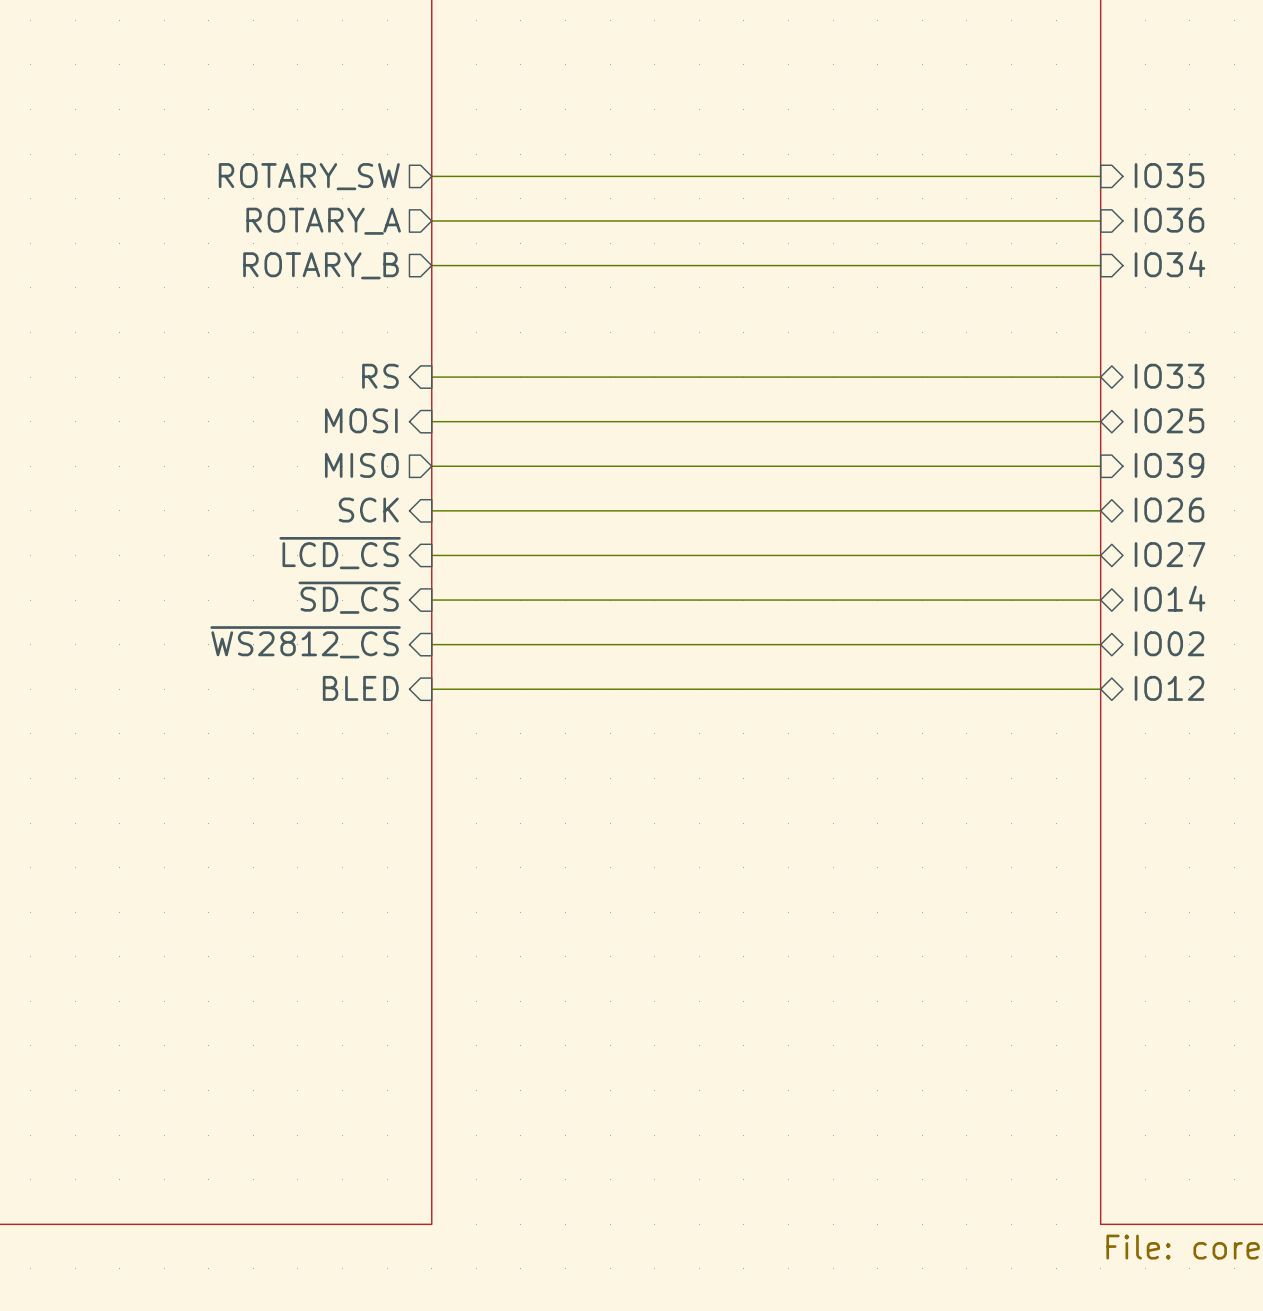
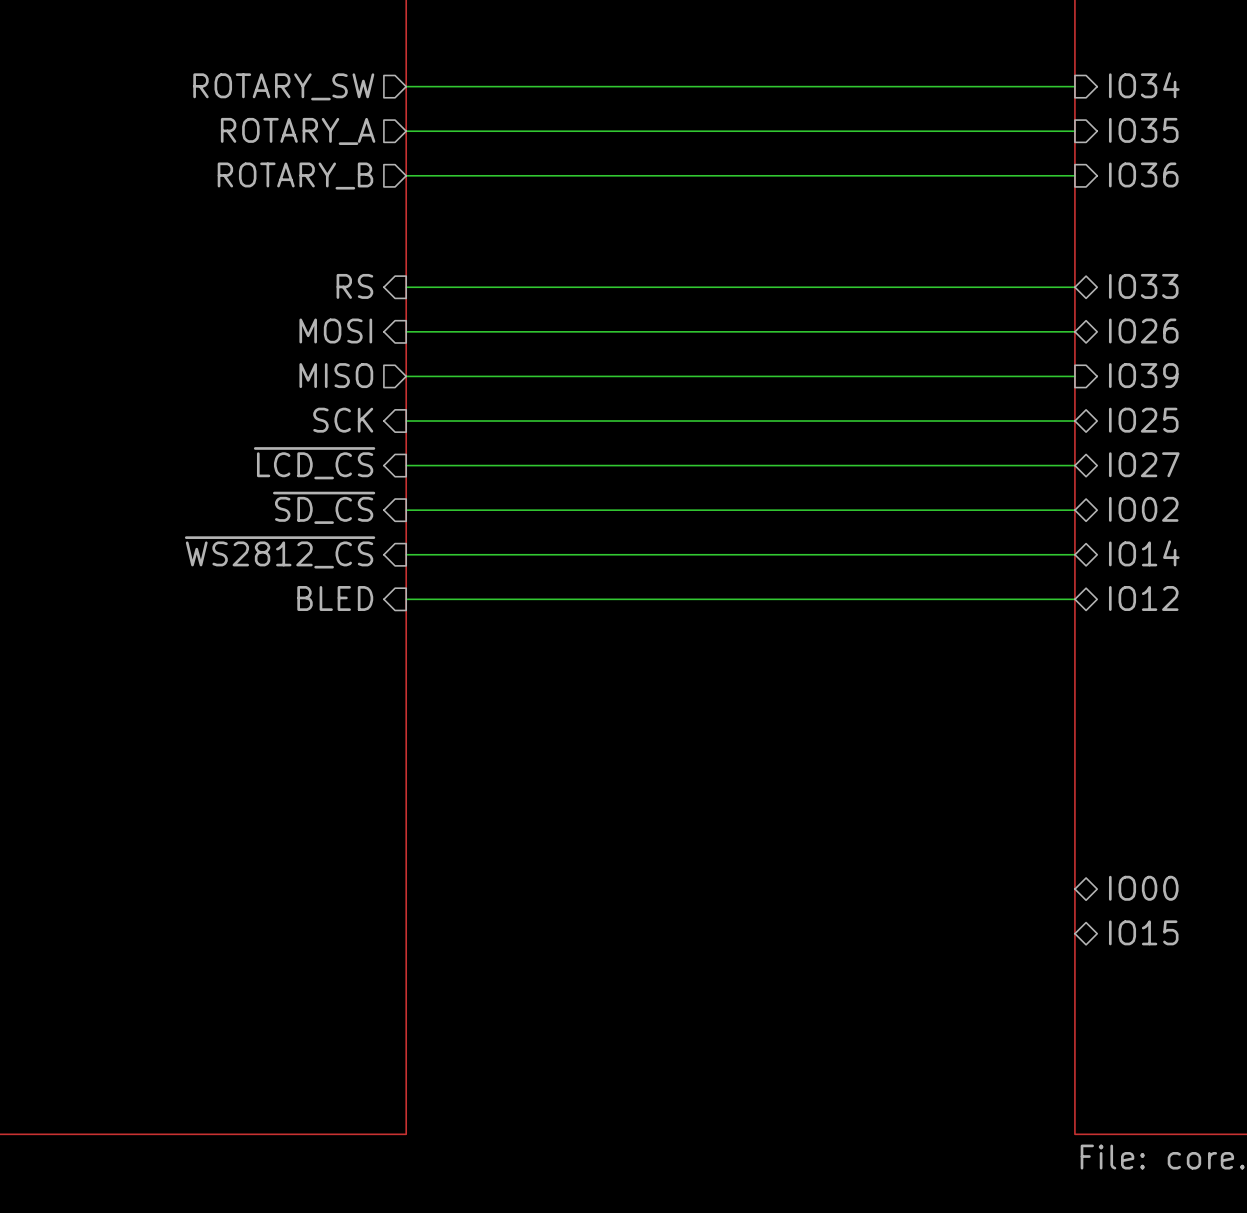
sheet pin: IO35 (1169, 175) -> IO34 (1144, 85)
sheet pin: IO36 (1169, 220) -> IO35 (1143, 130)
sheet pin: IO34 (1170, 264) -> IO36 (1143, 174)
sheet pin: IO25 (1169, 420) -> IO26 (1143, 331)
sheet pin: IO26 (1169, 510) -> IO25 (1143, 420)
sheet pin: IO14 (1170, 598) -> IO02 (1143, 509)
sheet pin: IO02 (1169, 643) -> IO14 (1144, 553)
sheet pin: none -> IO00 (1143, 888)
sheet pin: none -> IO15 (1143, 932)

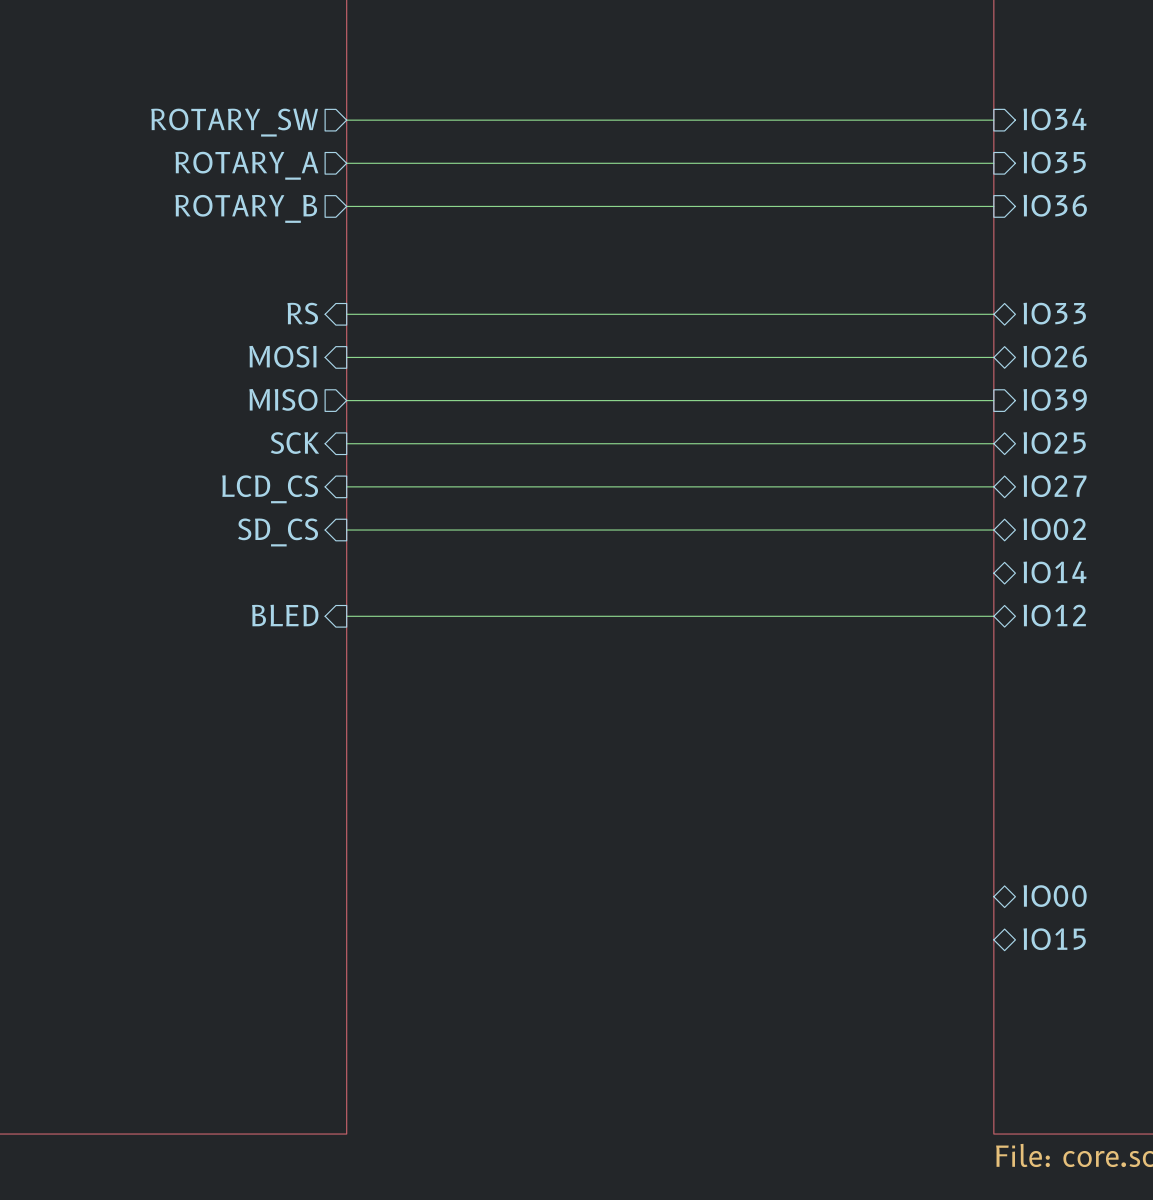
sheet pin: ~{LCD_CS} (314, 463) -> LCD_CS (270, 489)
sheet pin: ~{SD_CS} (324, 507) -> SD_CS (278, 532)
sheet pin: ~{WS2812_CS} (280, 552) -> none
wire: (406, 554) (1074, 554) -> none

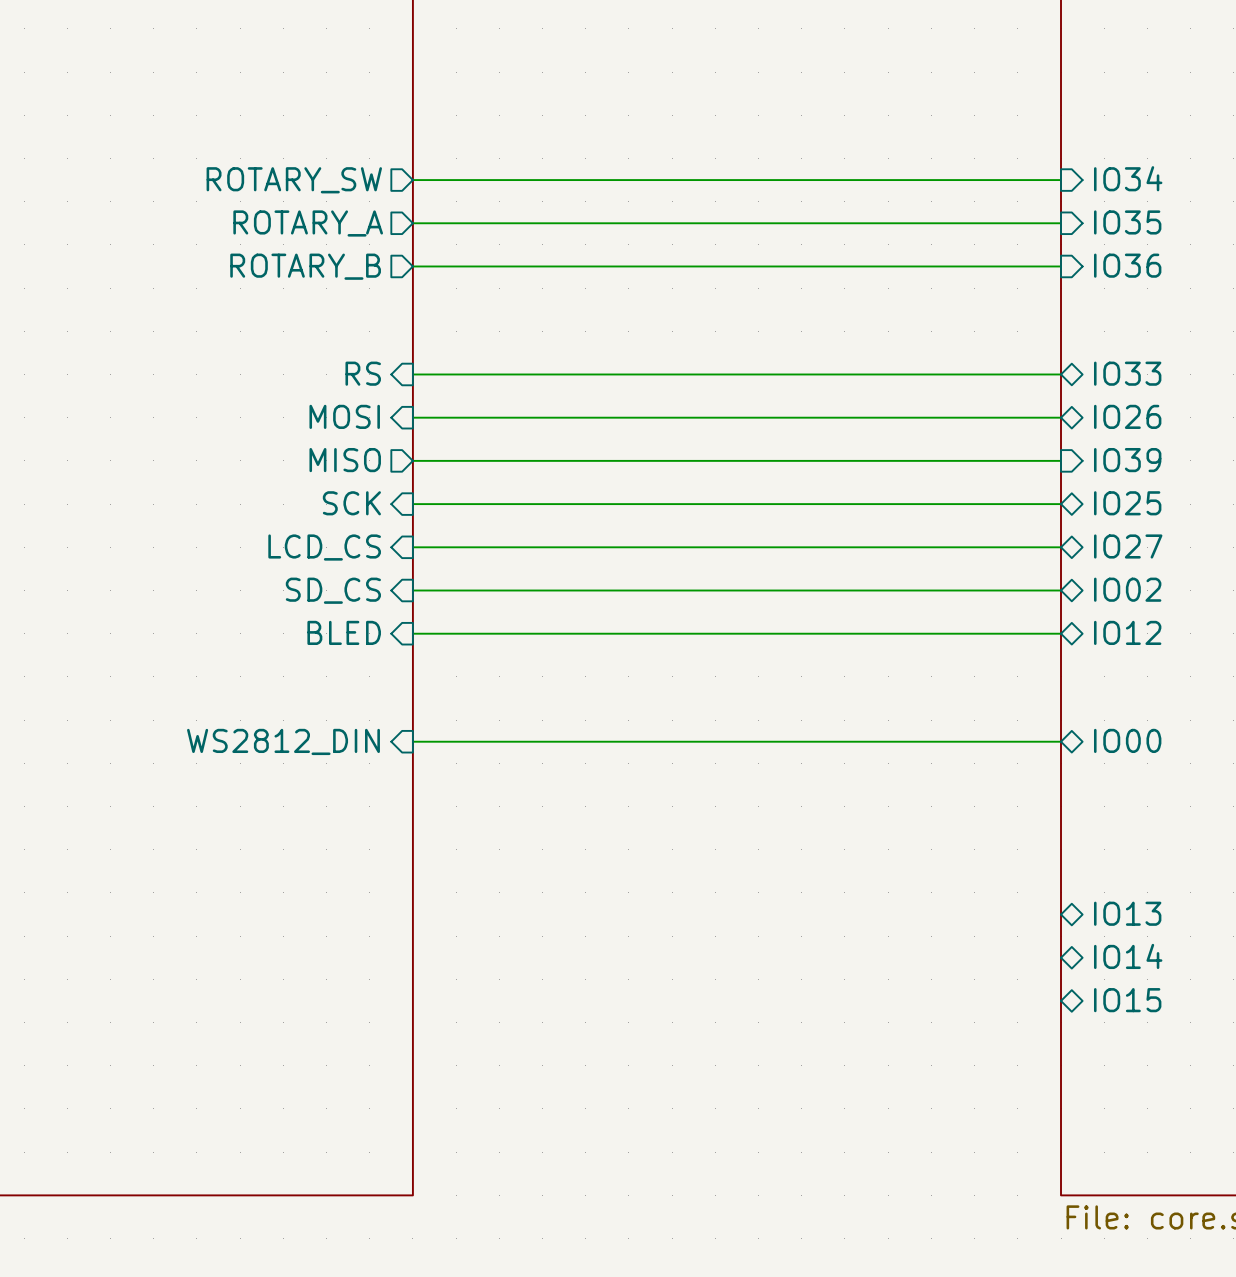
sheet pin: IO14 (1055, 572) -> IO12 (1127, 632)
sheet pin position: BLED (285, 615) -> BLED (344, 632)
sheet pin: IO12 (1054, 615) -> none
wire: (346, 616) (993, 616) -> (412, 633) (1061, 633)
sheet pin: none -> IO00 (1127, 740)
wire: none -> (412, 741) (1061, 741)
sheet pin: none -> WS2812_DIN (283, 741)
sheet pin: none -> IO13 (1127, 913)
sheet pin: IO00 (1055, 896) -> IO14 (1128, 956)

